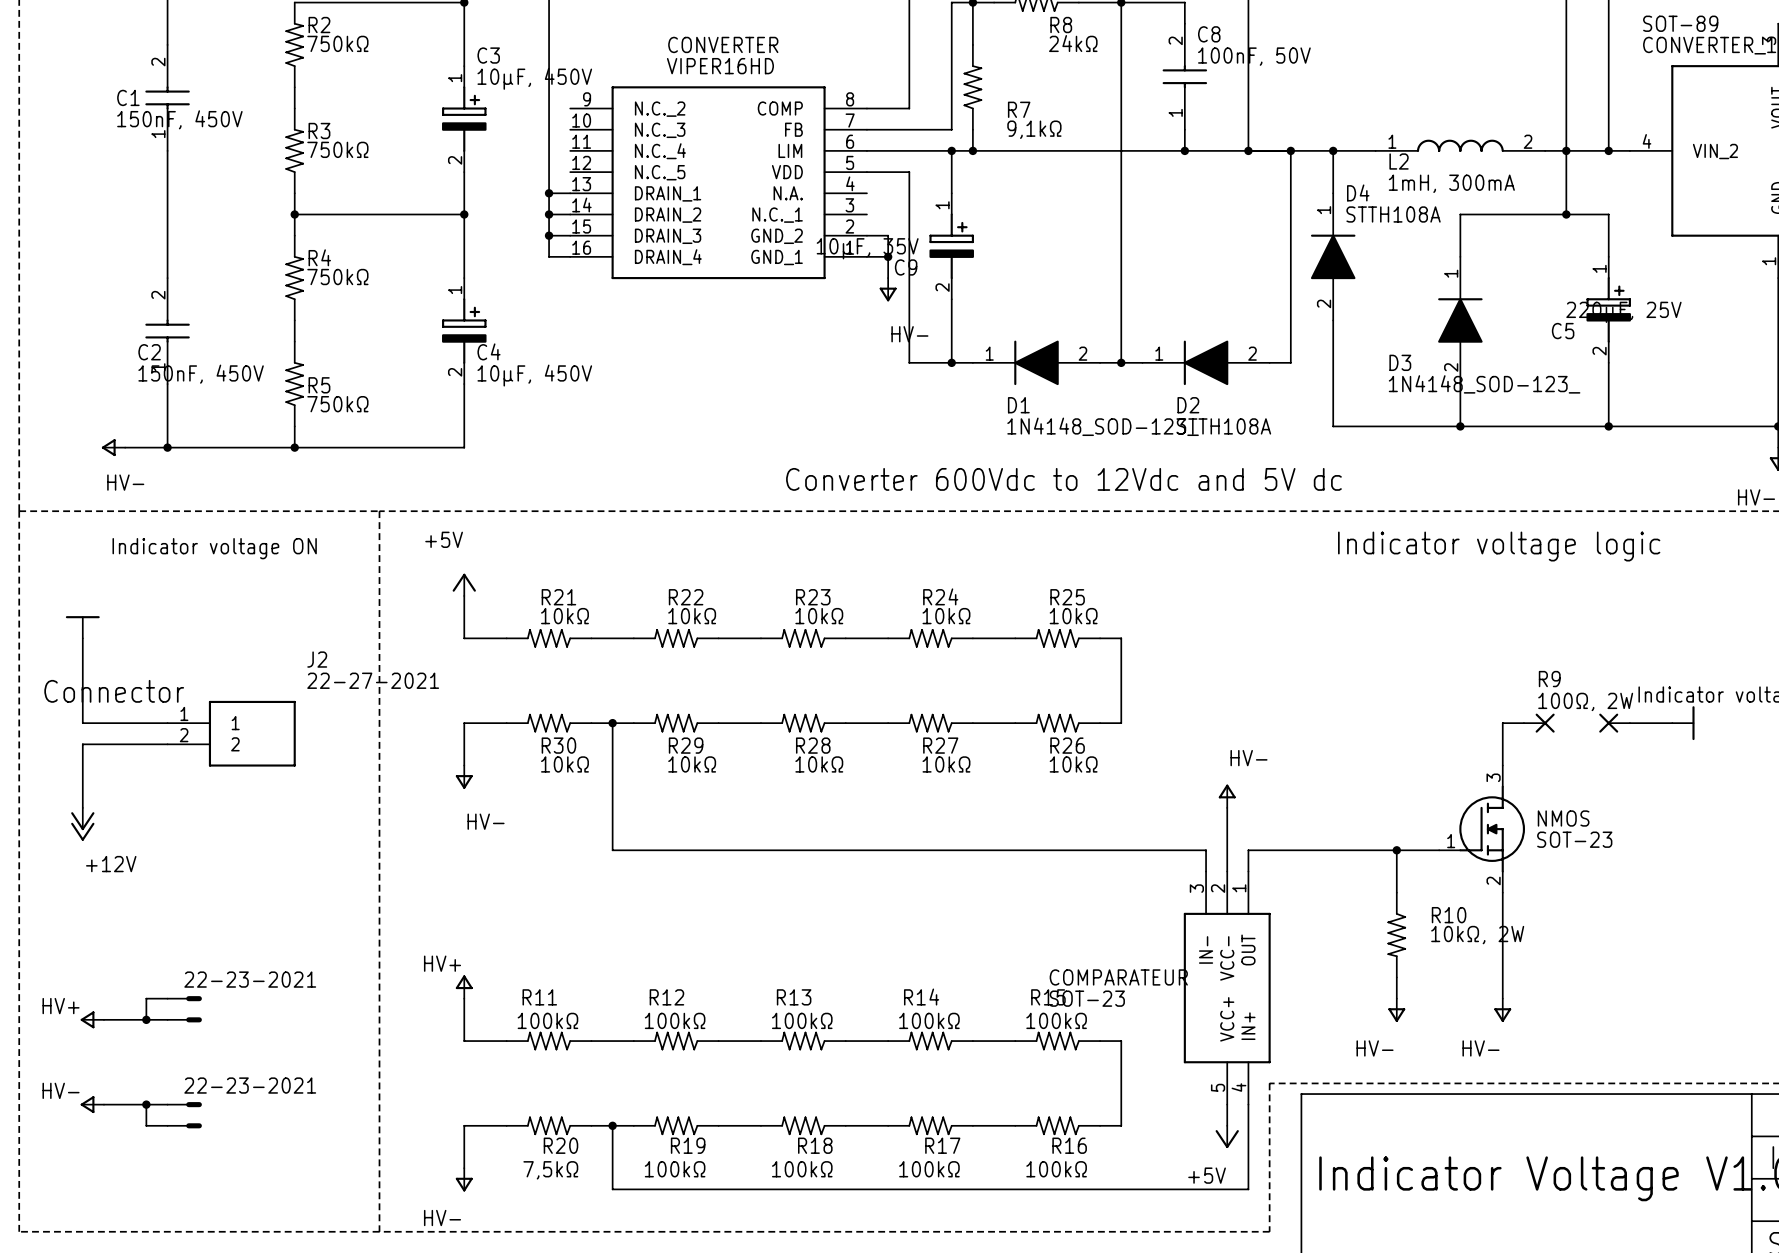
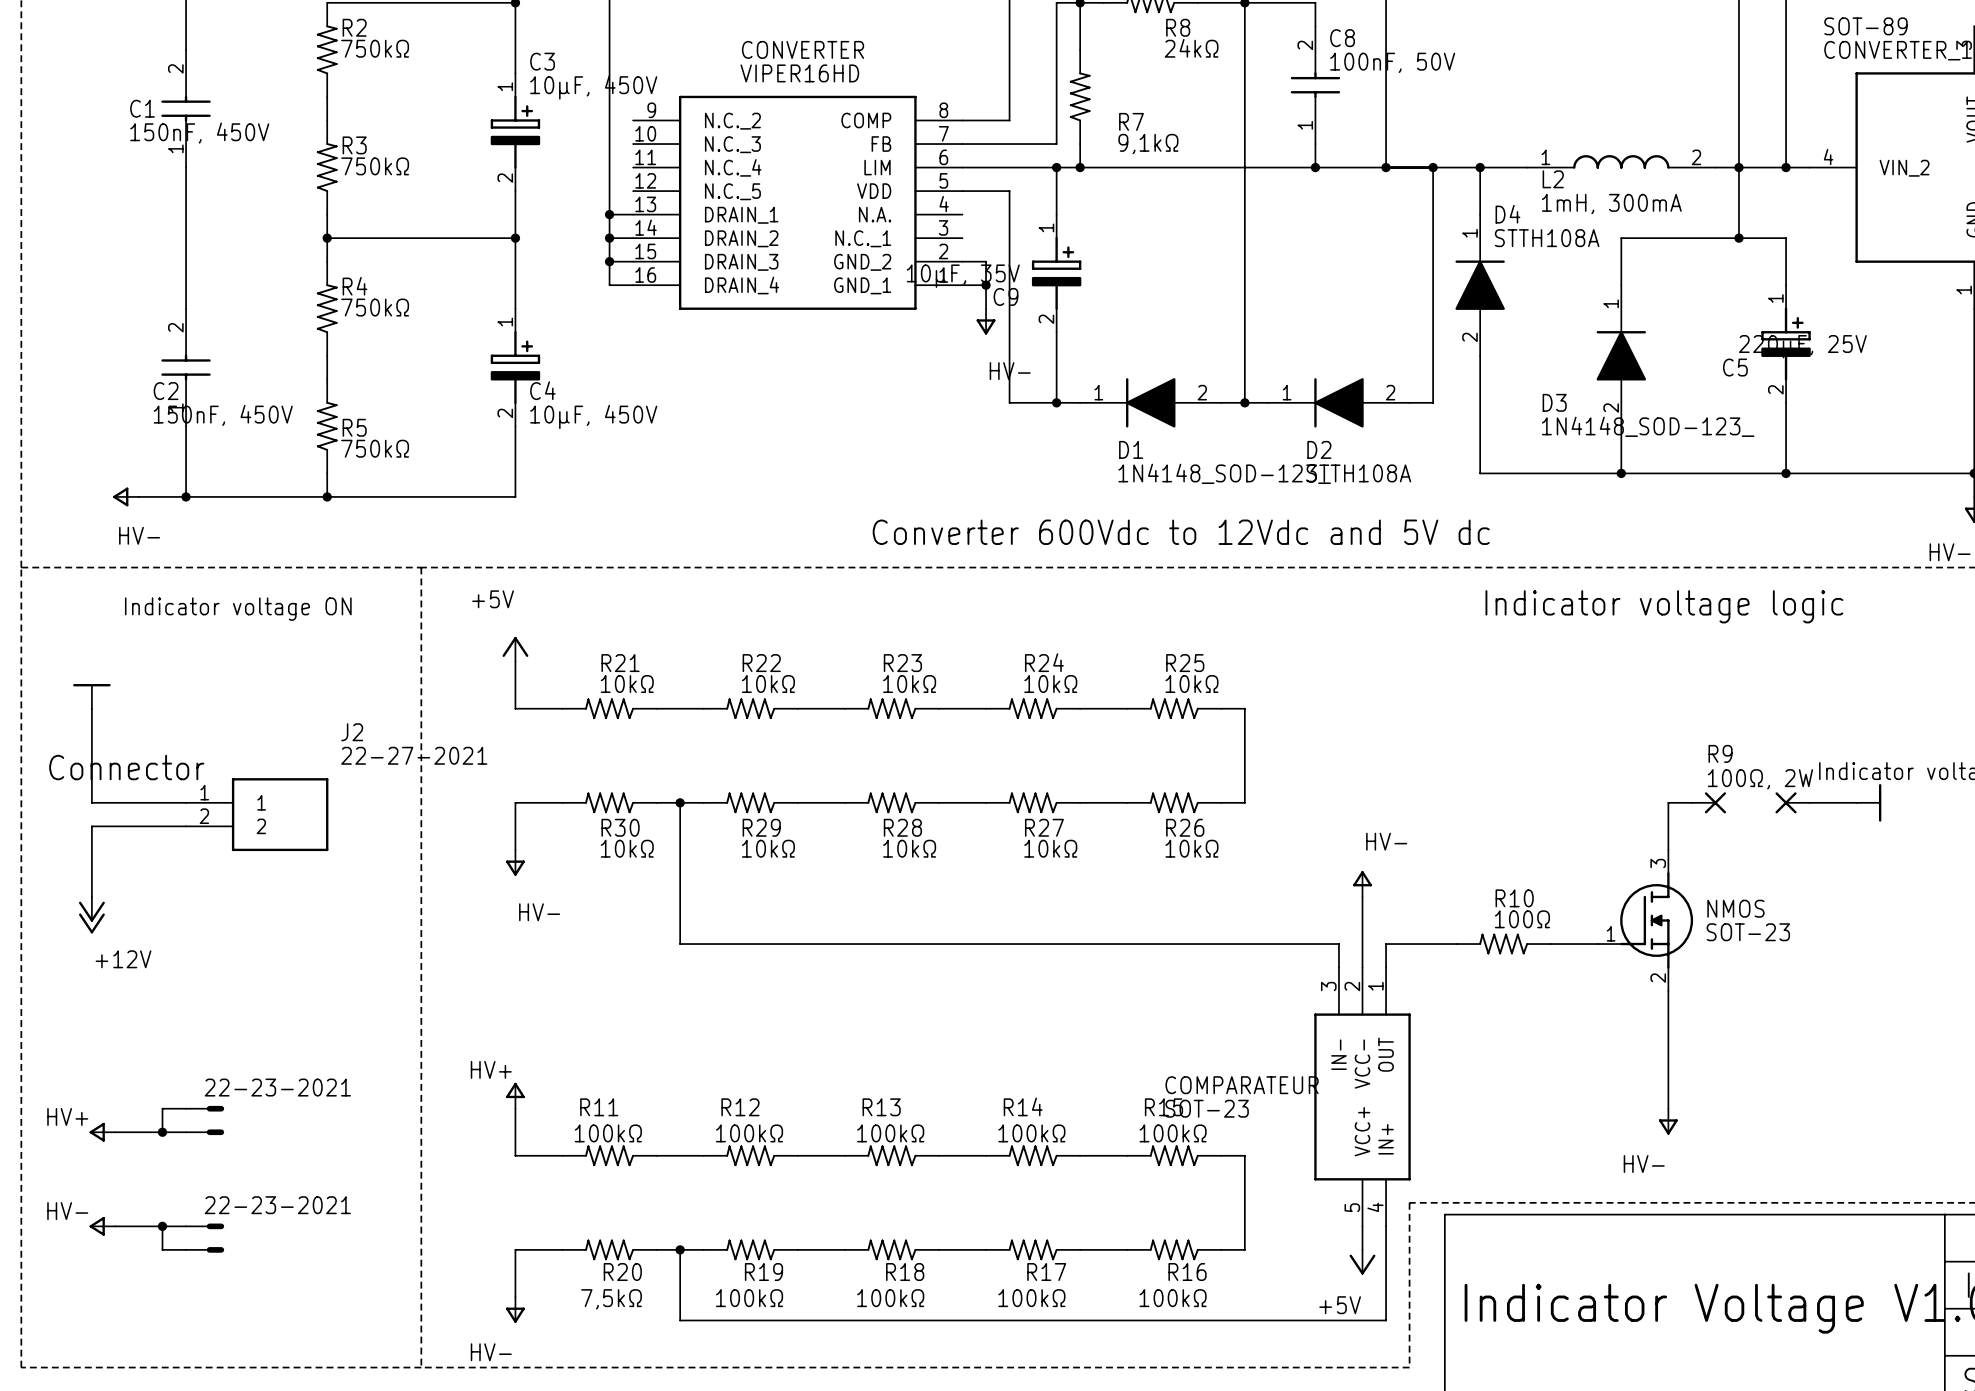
wire: (1312, 850) (1396, 850) (1396, 892) -> none
junction: (1396, 850) -> none
R10 name position: R10 (1449, 915) -> R10 (1514, 898)
R10 rotation: 0° (1396, 935) -> 90° clockwise (1503, 944)
R10 position: (1396, 935) -> (1503, 944)
R10 value: 10kΩ, 2W (1477, 935) -> 100Ω (1522, 919)
wire: (1396, 977) (1396, 998) -> none
power symbol: HV- (1396, 1010) -> none

